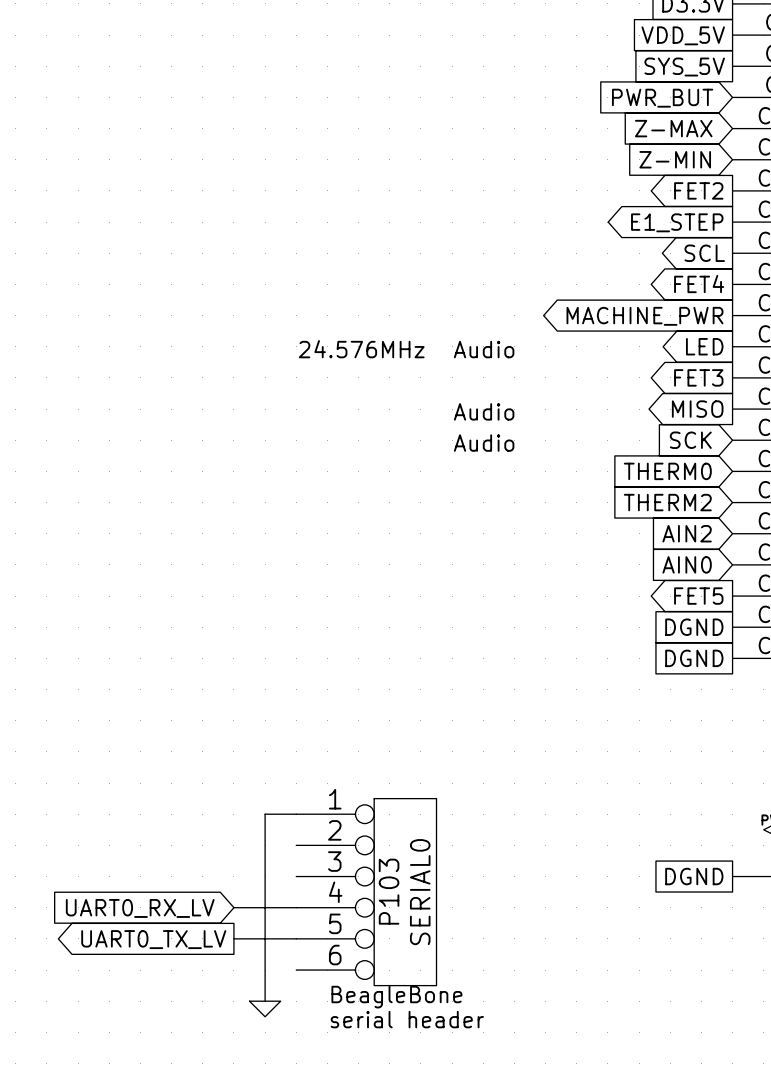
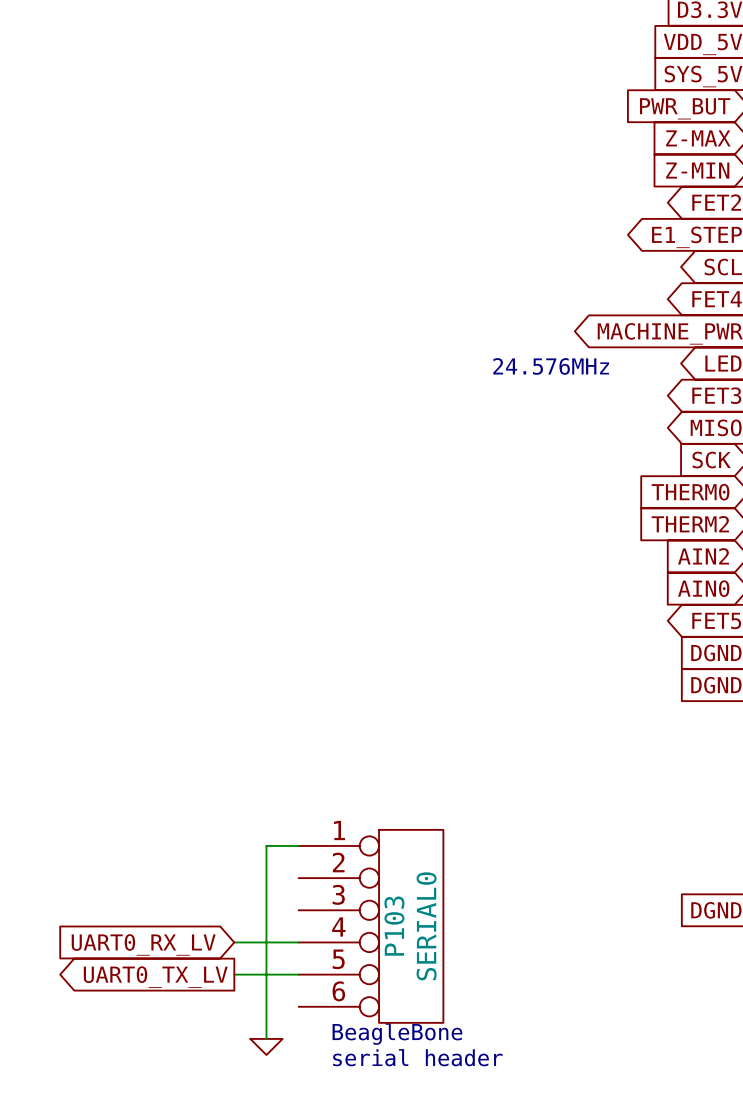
text position: 24.576MHz (361, 349) -> 24.576MHz (551, 366)
text: Audio (484, 349) -> none
text: Audio (484, 411) -> none
text: Audio (484, 443) -> none

